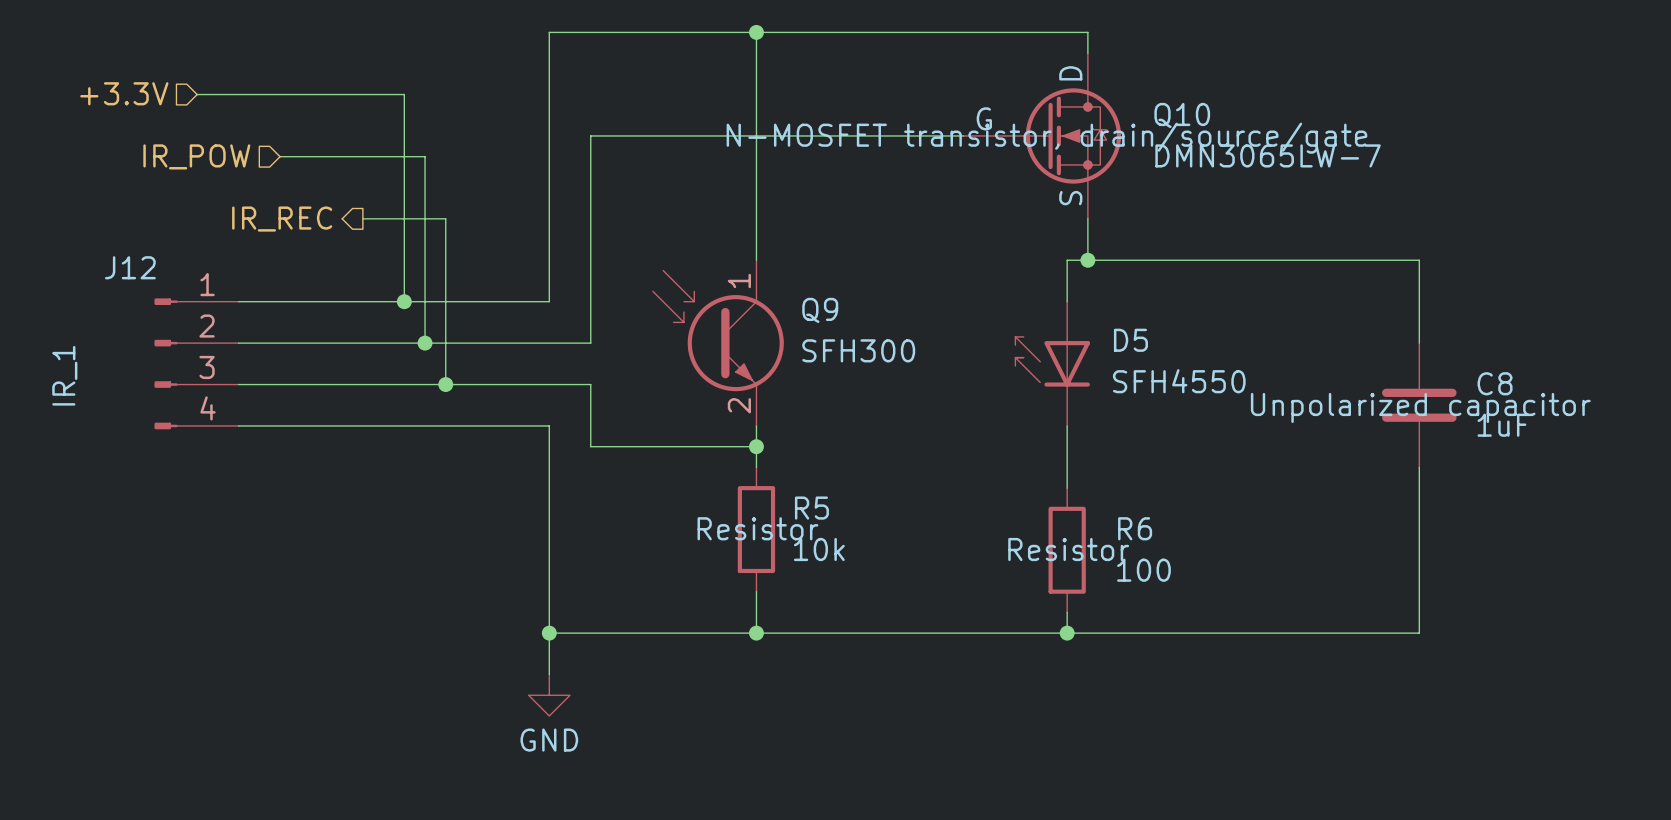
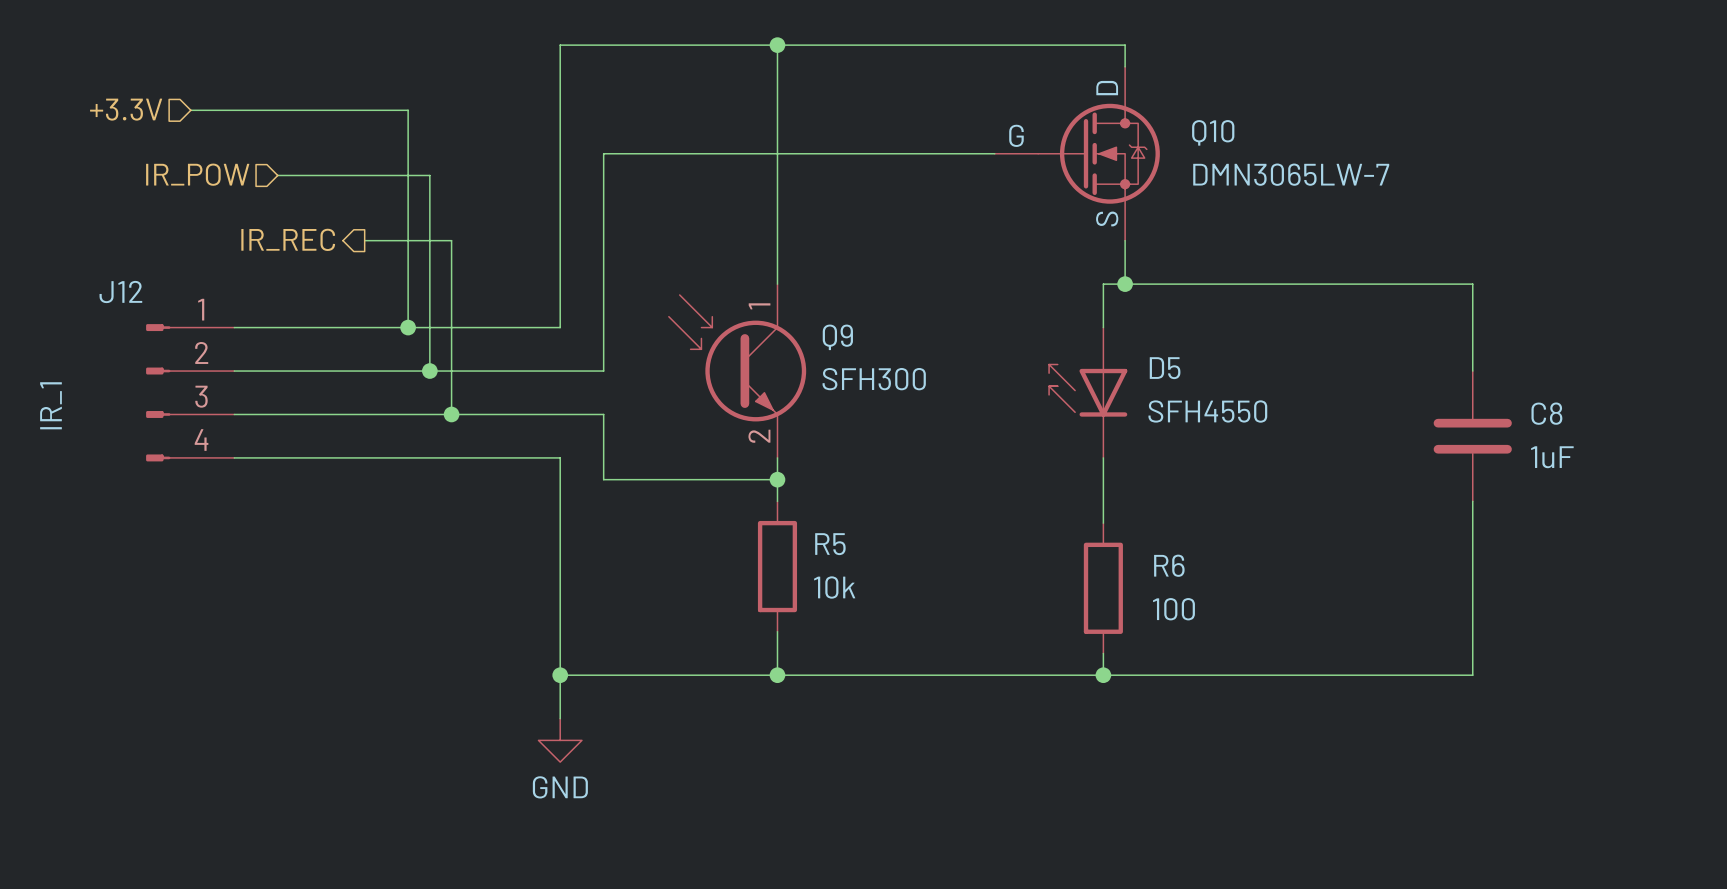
Q10 text: N-MOSFET transistor, drain/source/gate (1046, 138) -> none
C8 text: Unpolarized capacitor (1420, 407) -> none
R5 text: Resistor (757, 528) -> none
R6 text: Resistor (1068, 549) -> none

